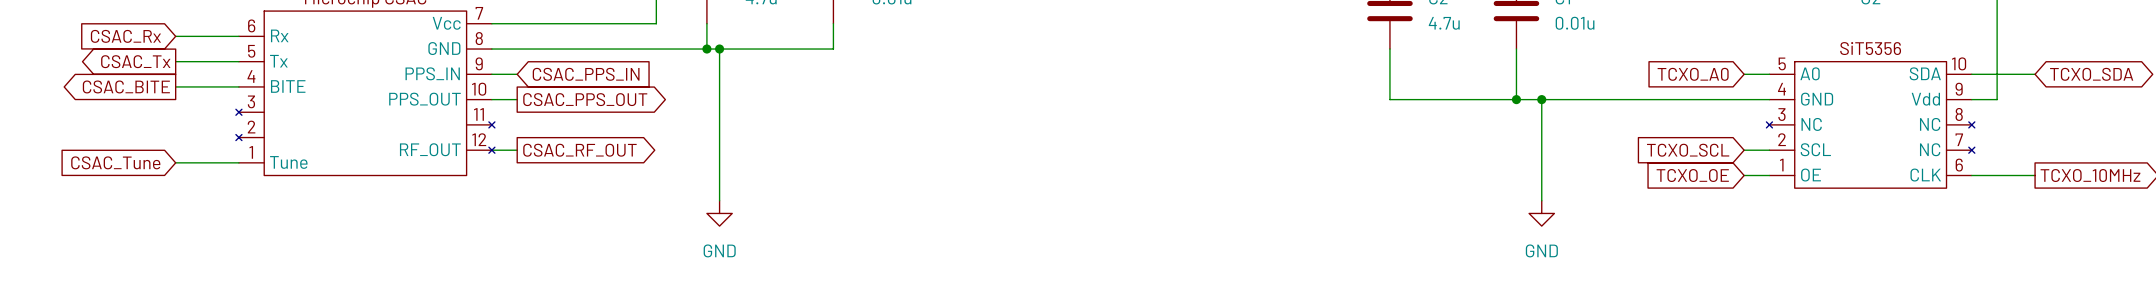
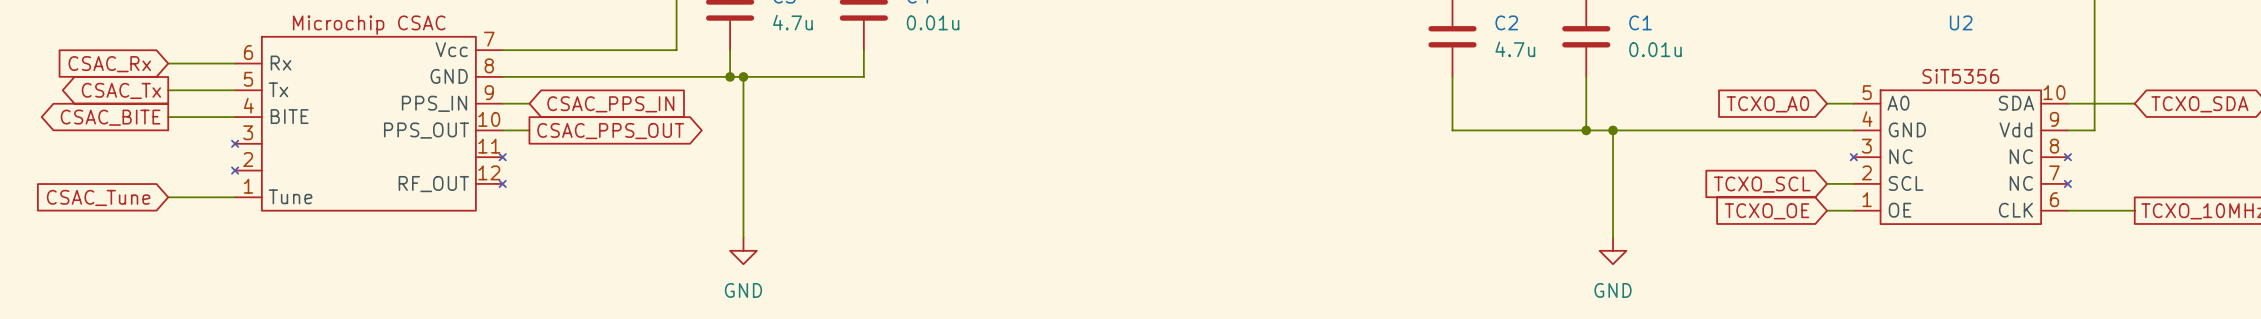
wire: (491, 150) (517, 150) -> none
global label: CSAC_RF_OUT (579, 150) -> none

